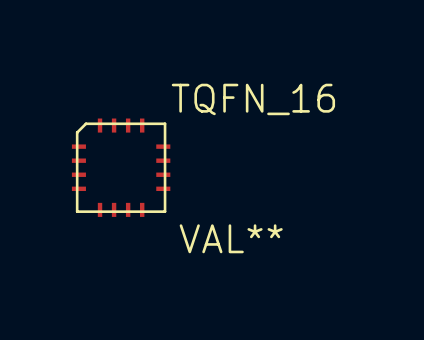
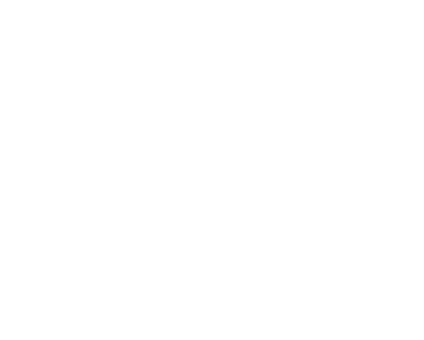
TQFN_16: VAL** (121, 167) -> none

